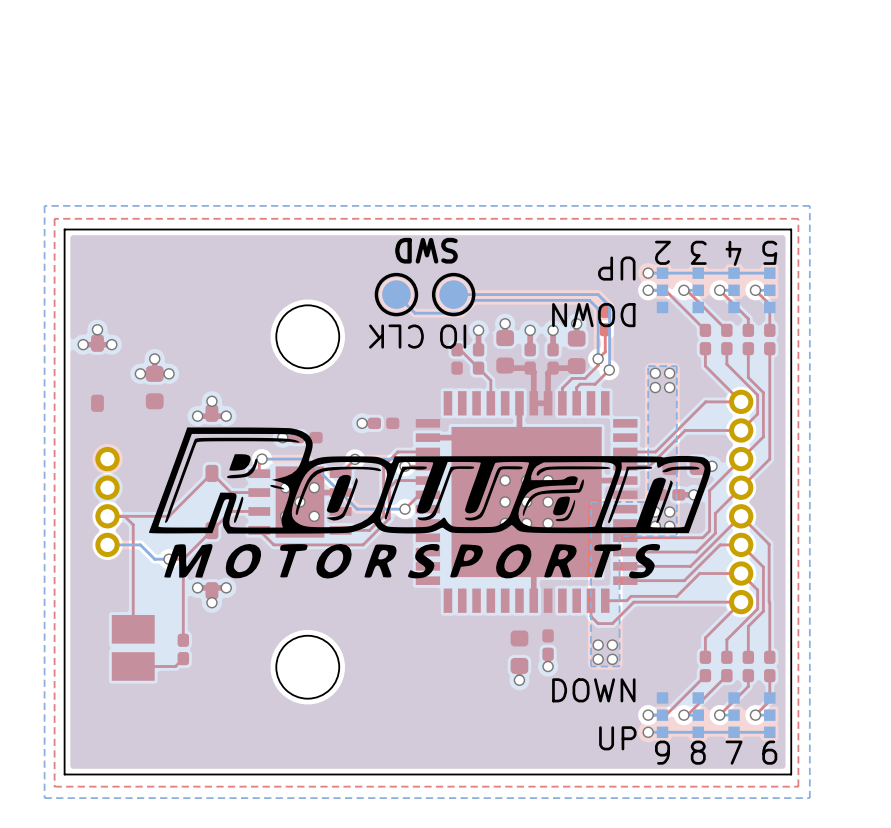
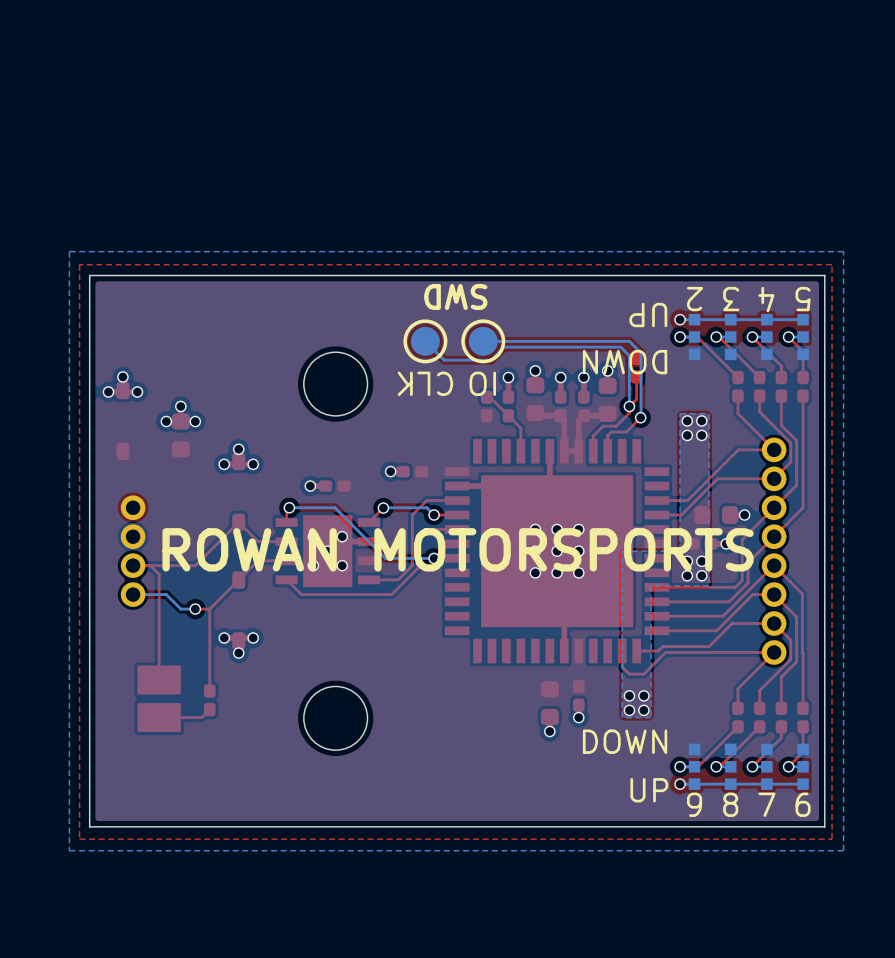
drawing: [148, 427, 711, 579] -> none
text: none -> ROWAN MOTORSPORTS (458, 549)

